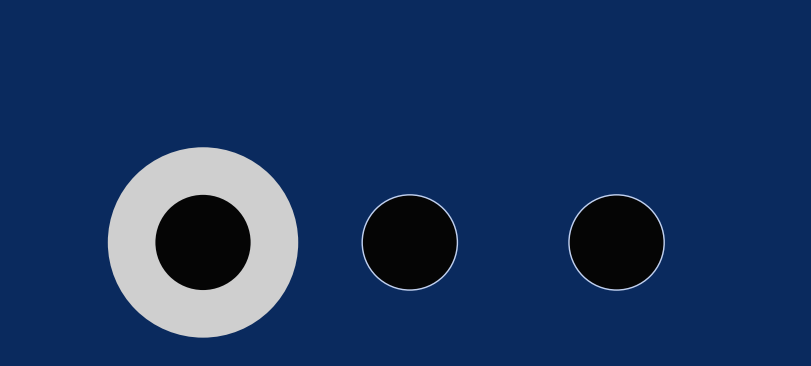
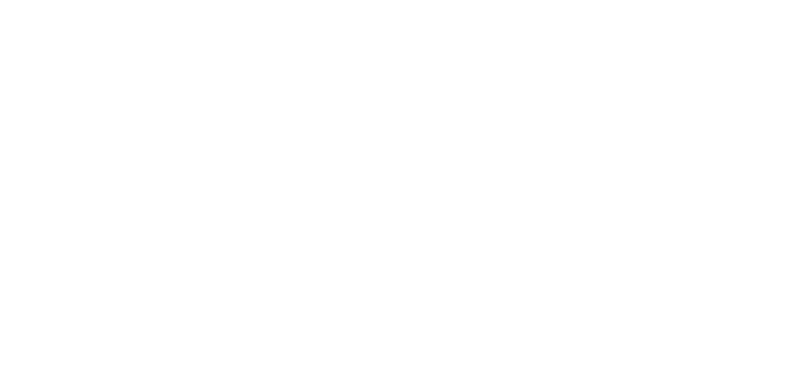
part: (203, 242) -> none
part: (409, 242) -> none
part: (616, 242) -> none

